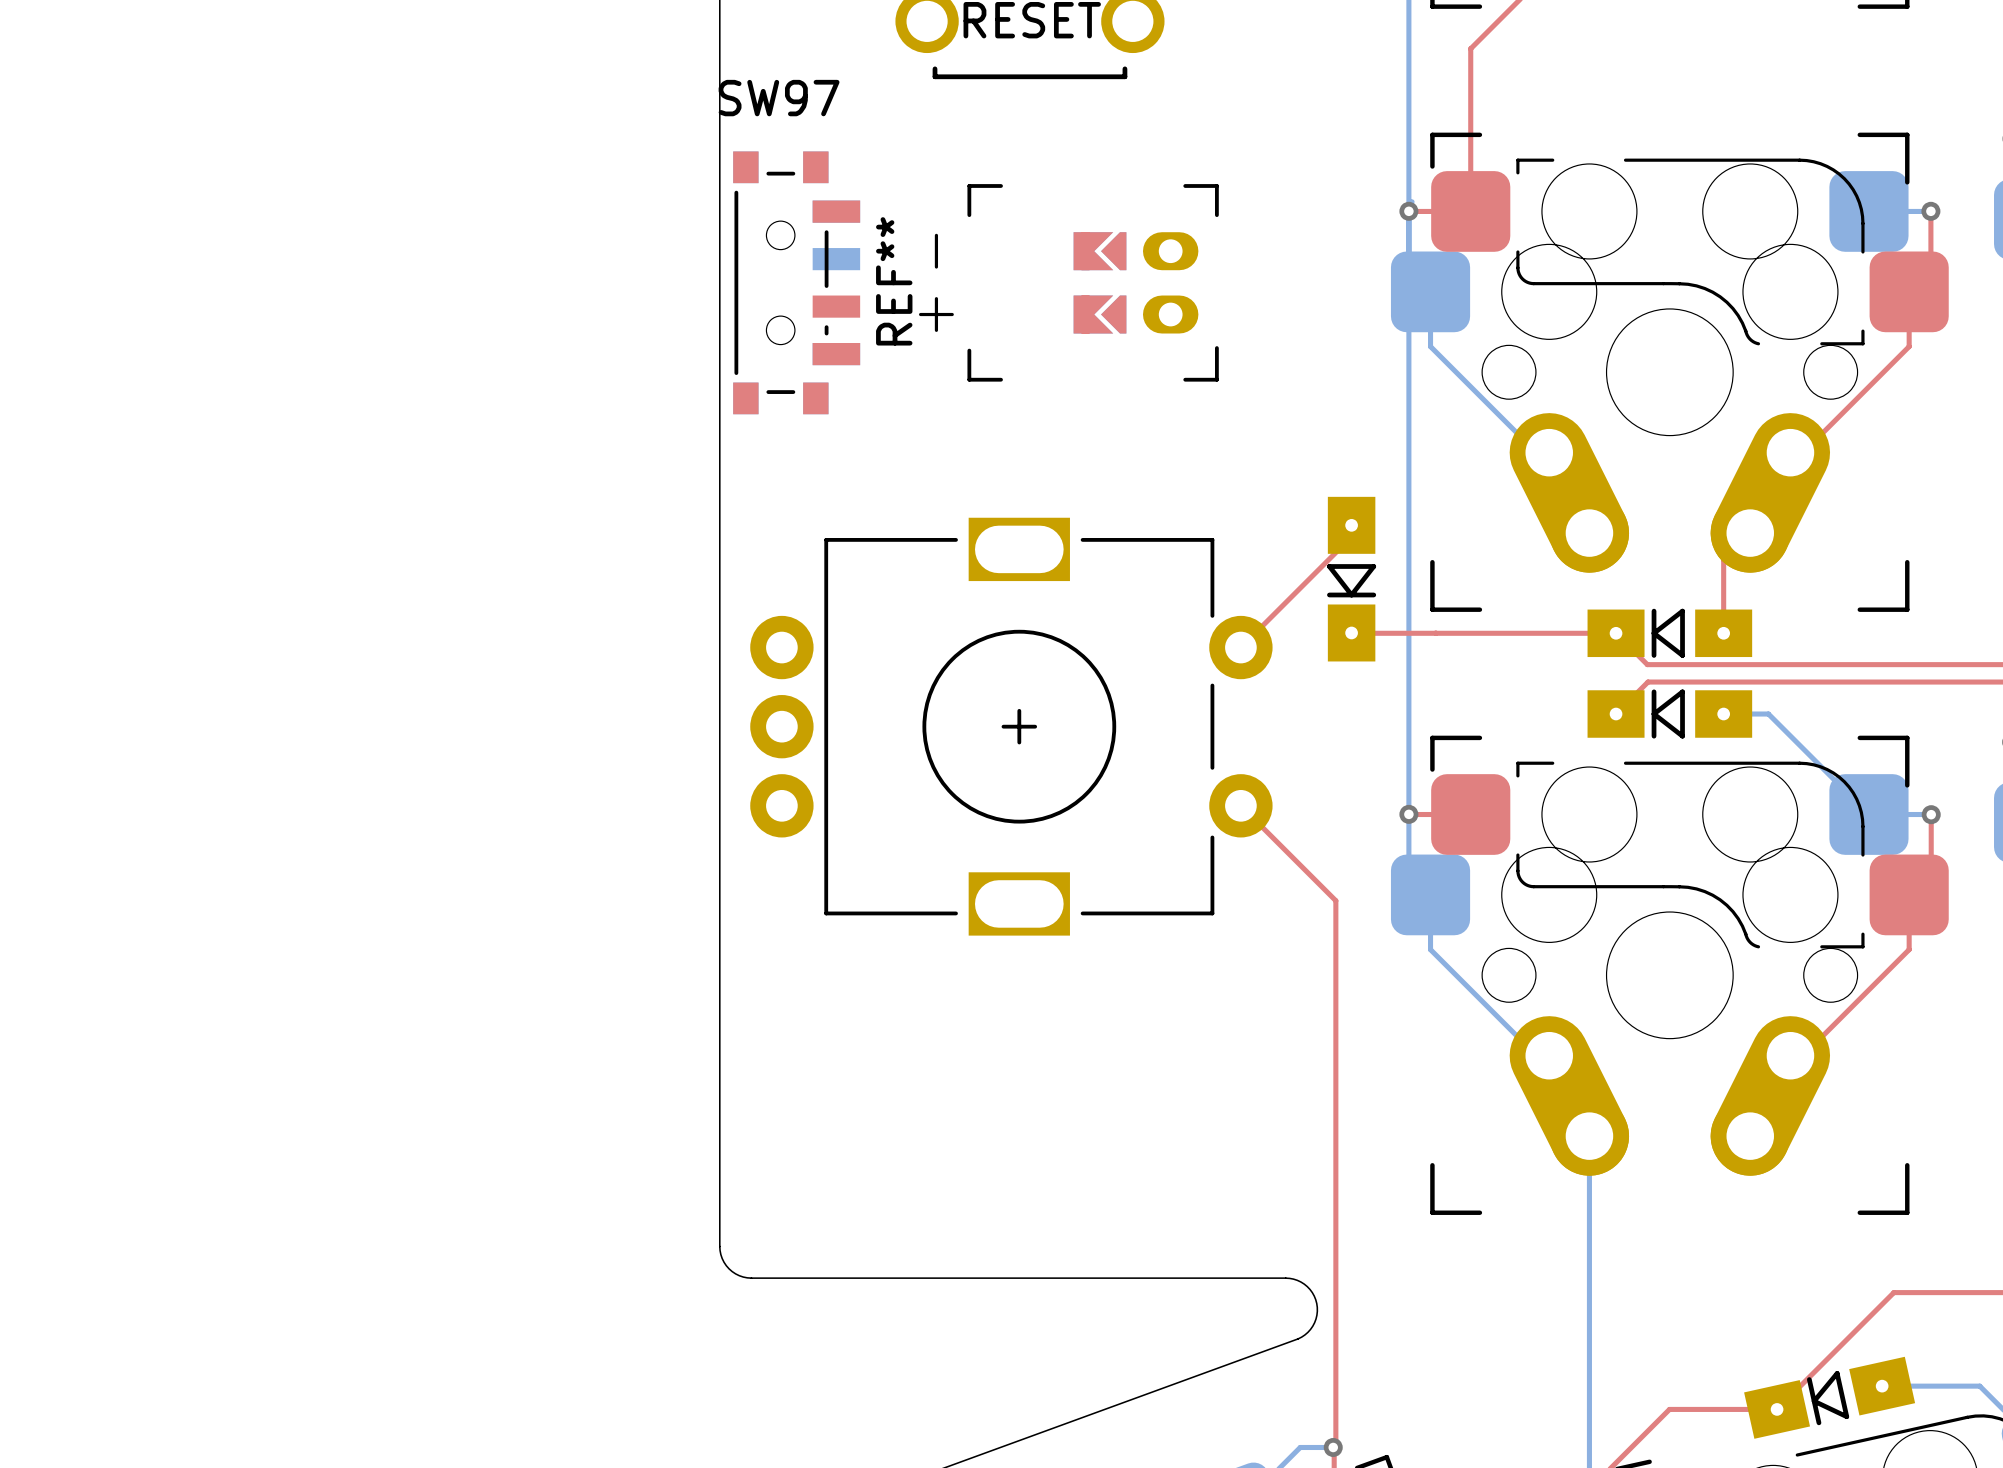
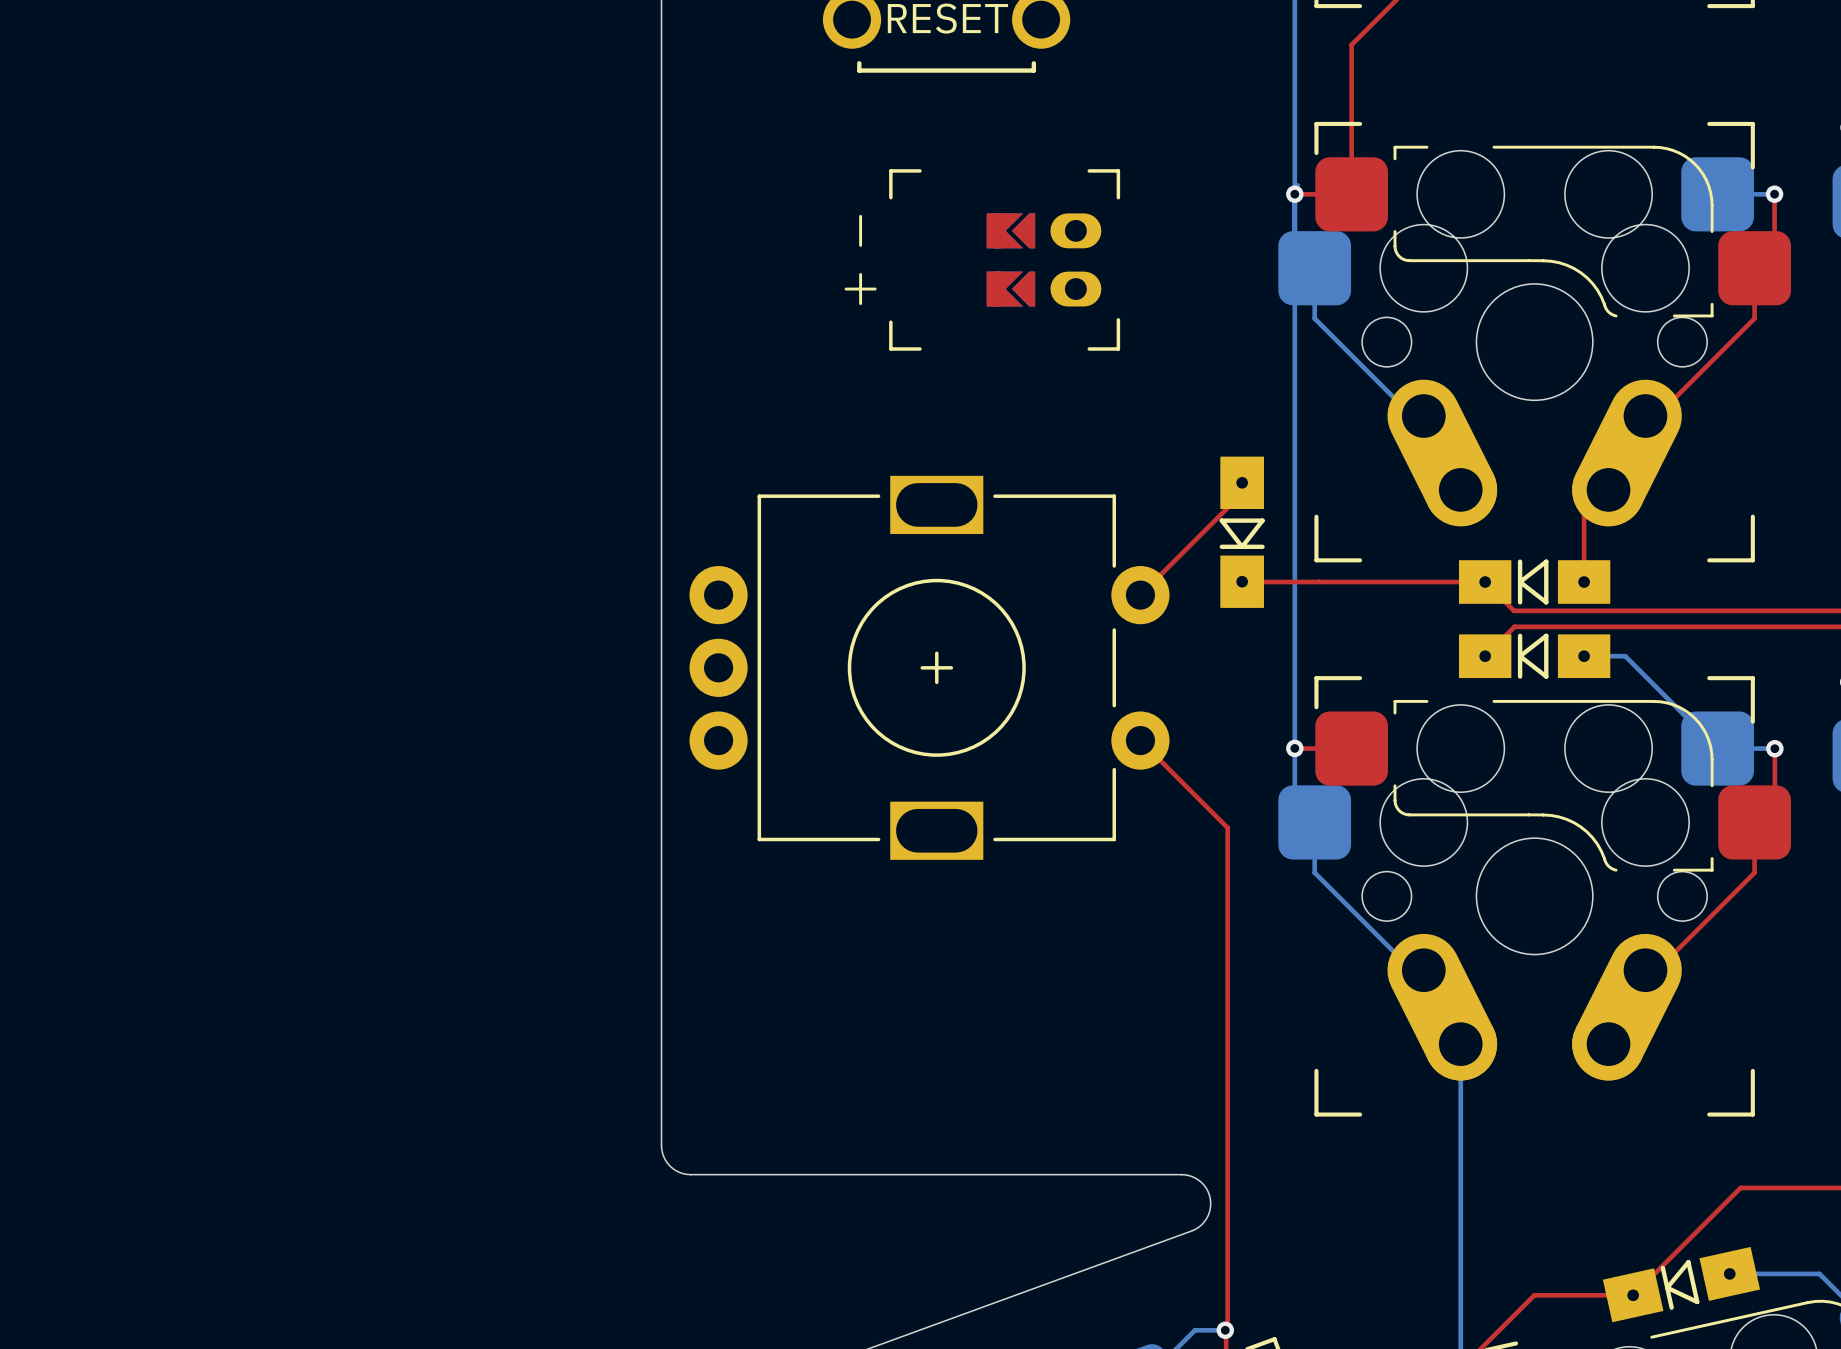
SW97: (796, 282) -> none

